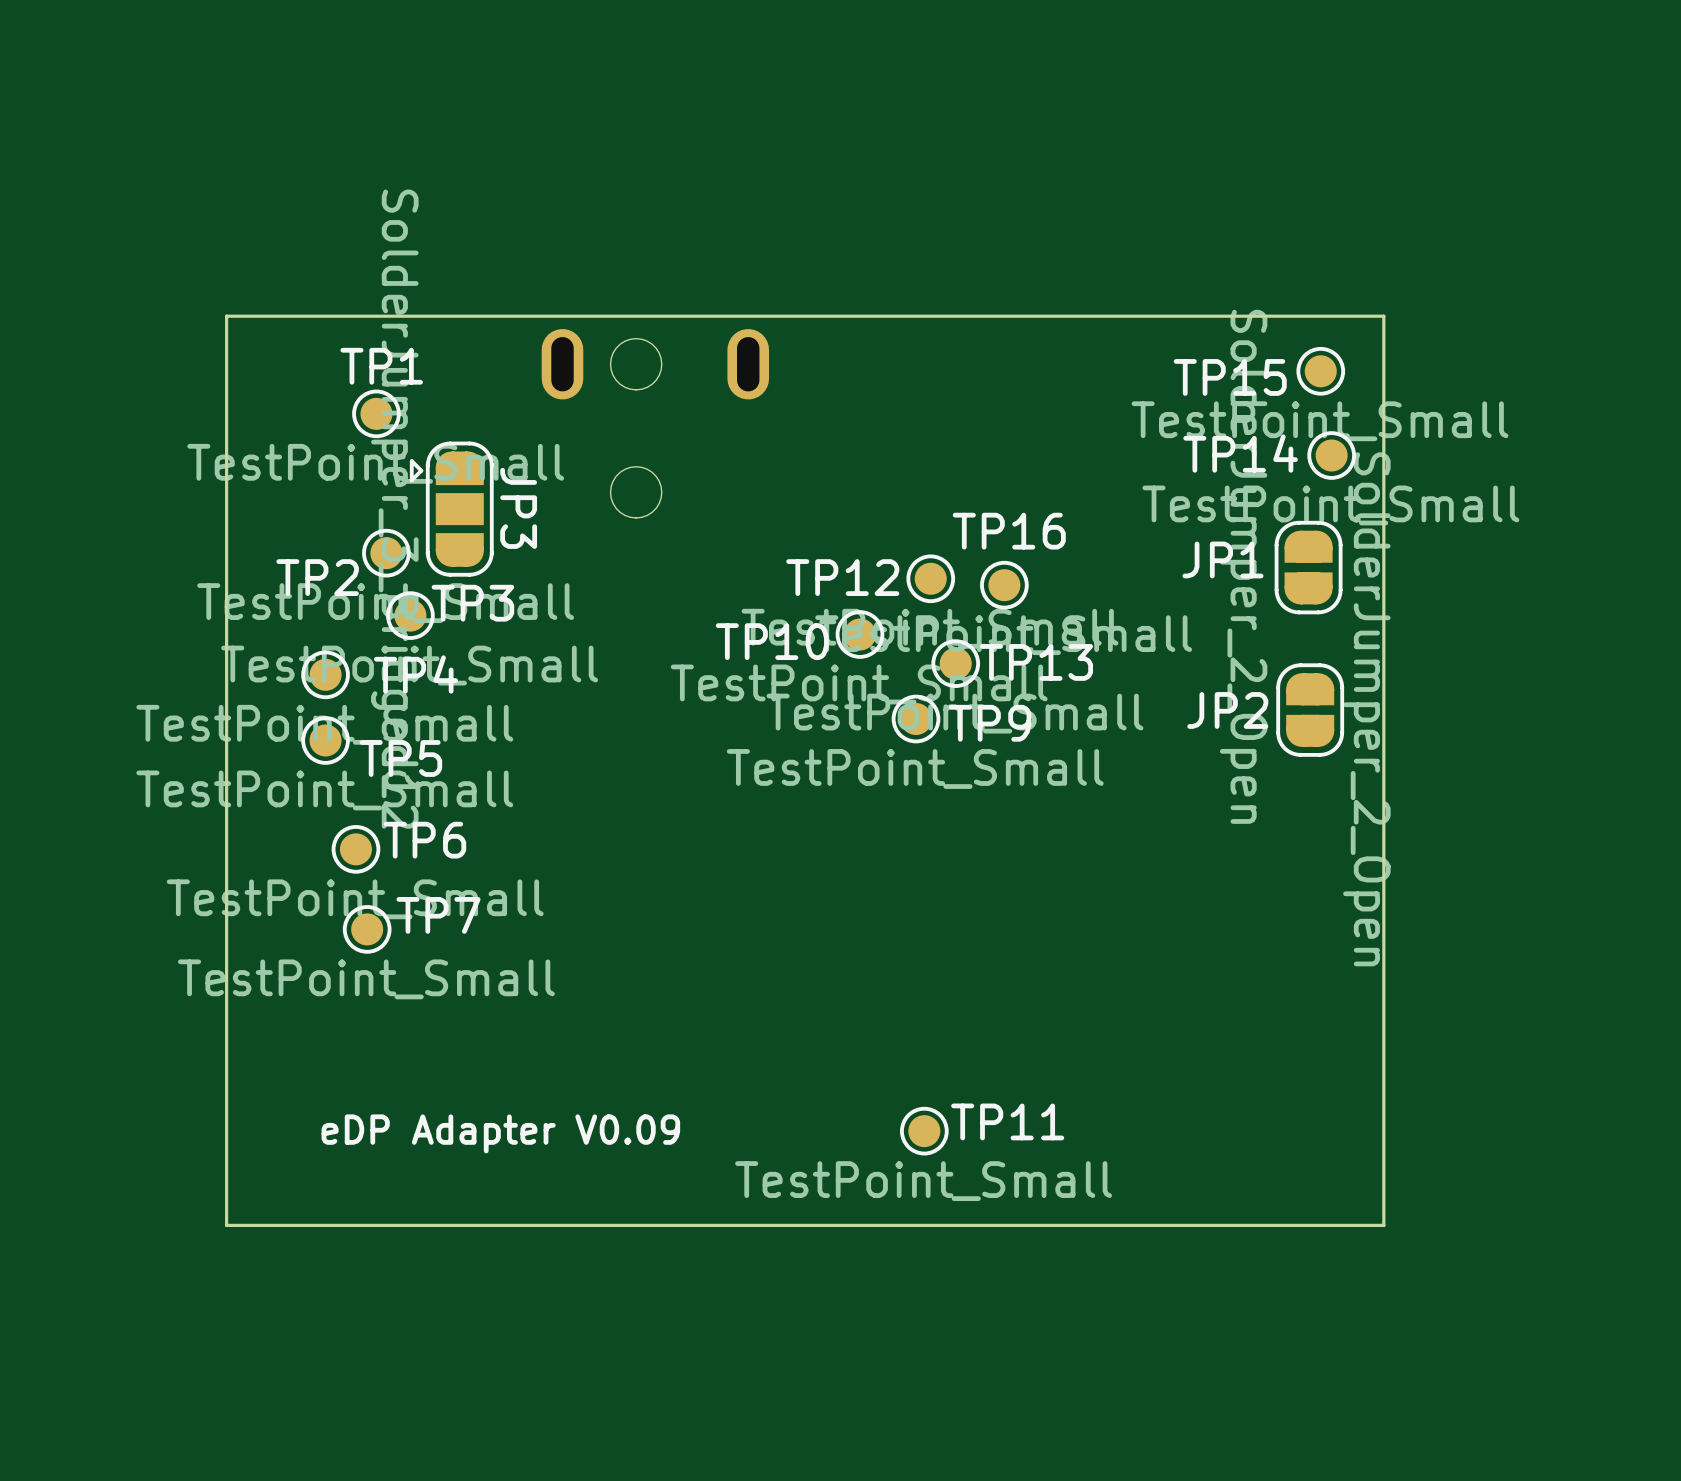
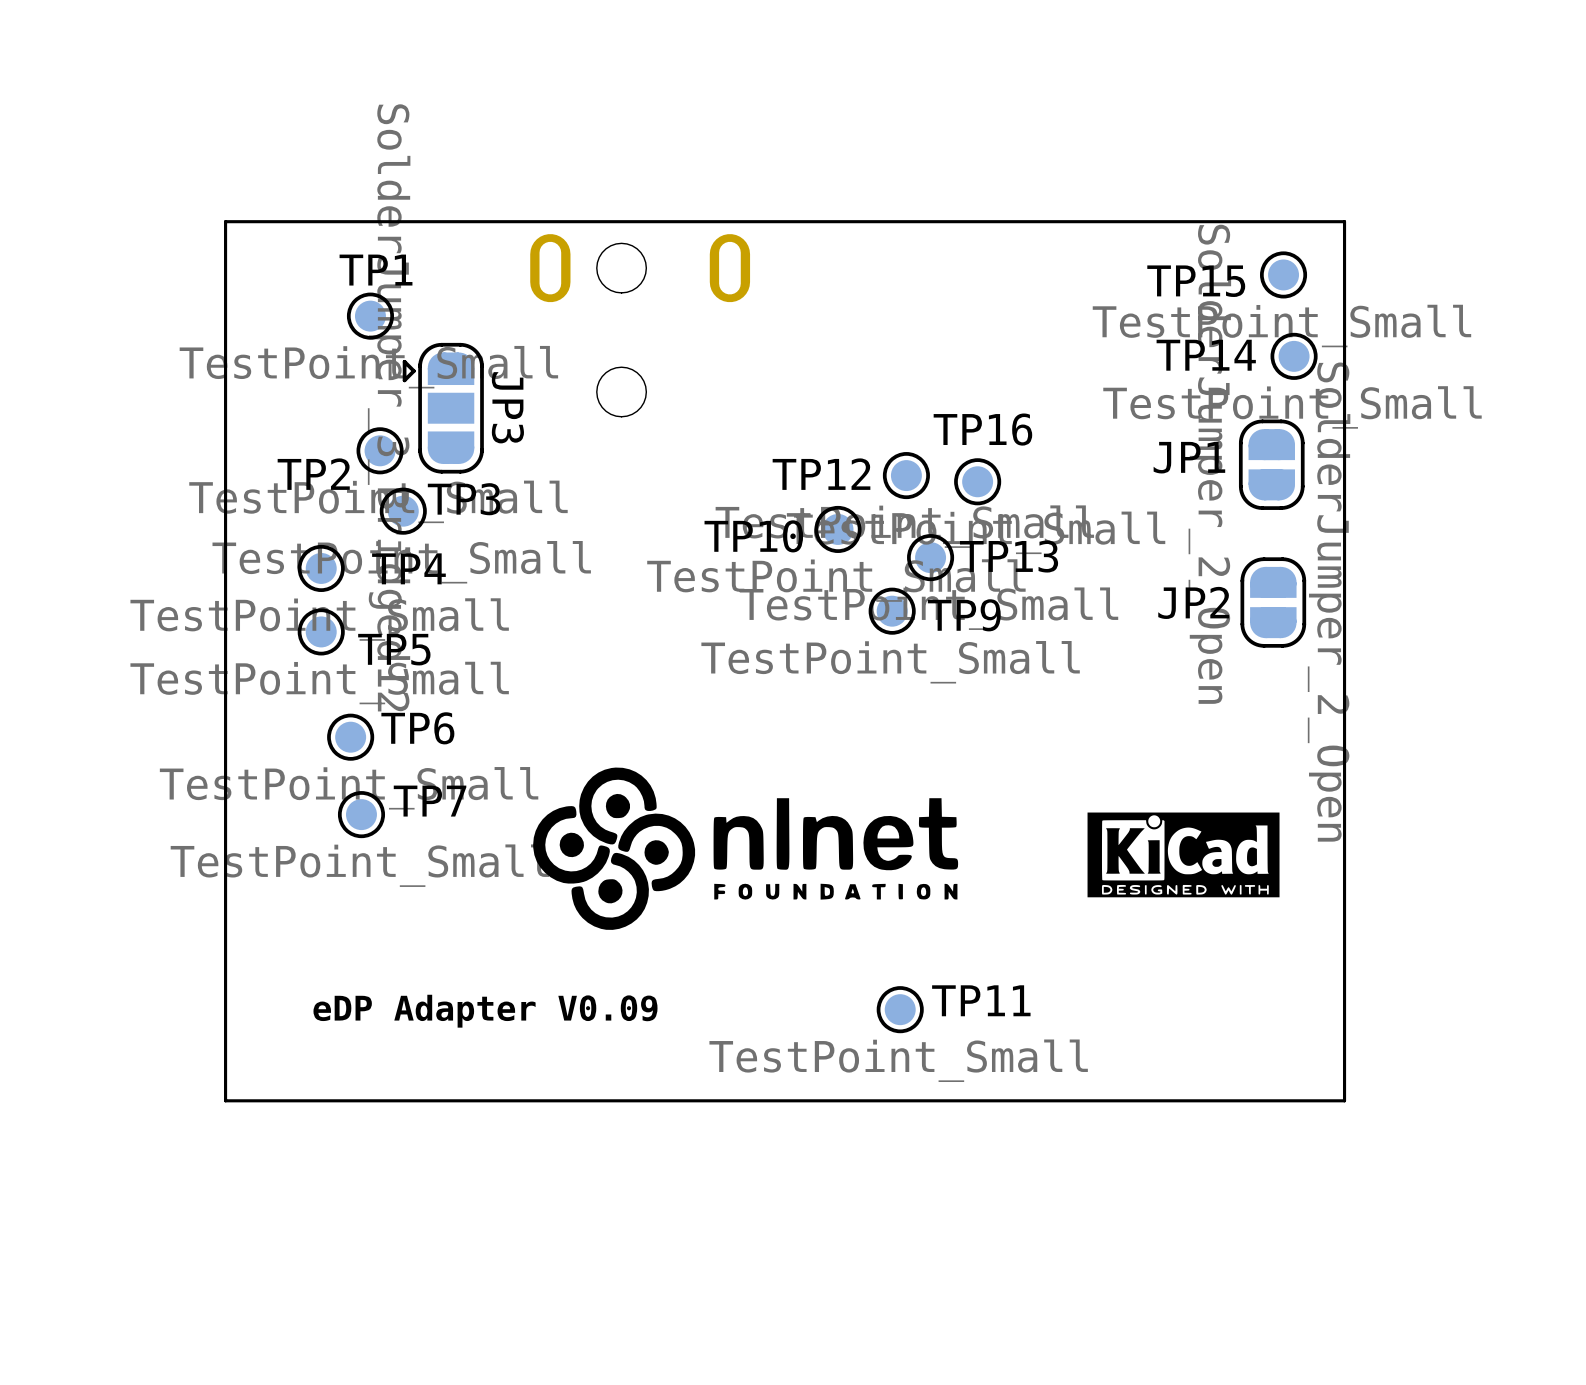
drawing: none -> [533, 767, 959, 930]
drawing: none -> [1087, 812, 1280, 898]

